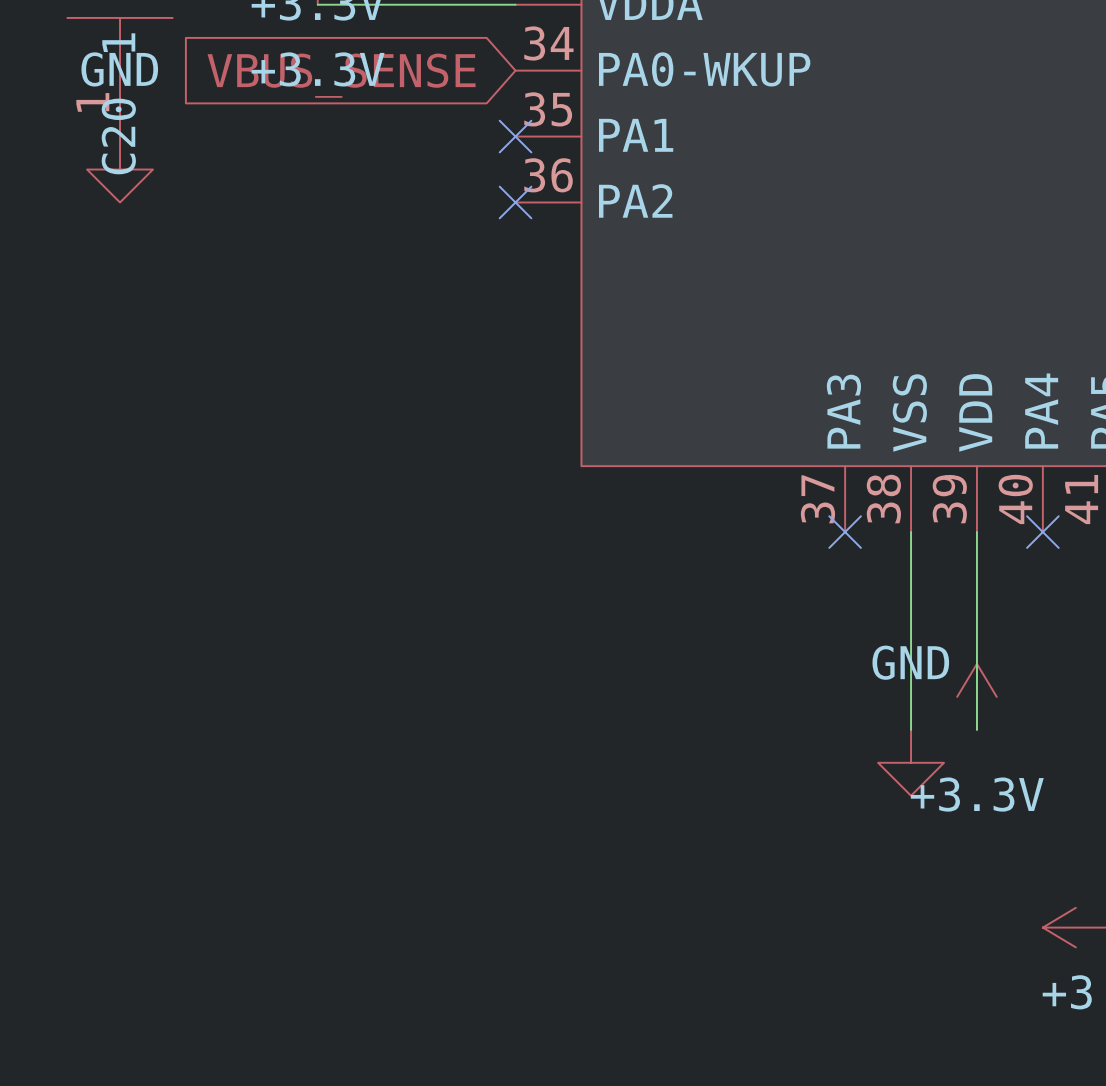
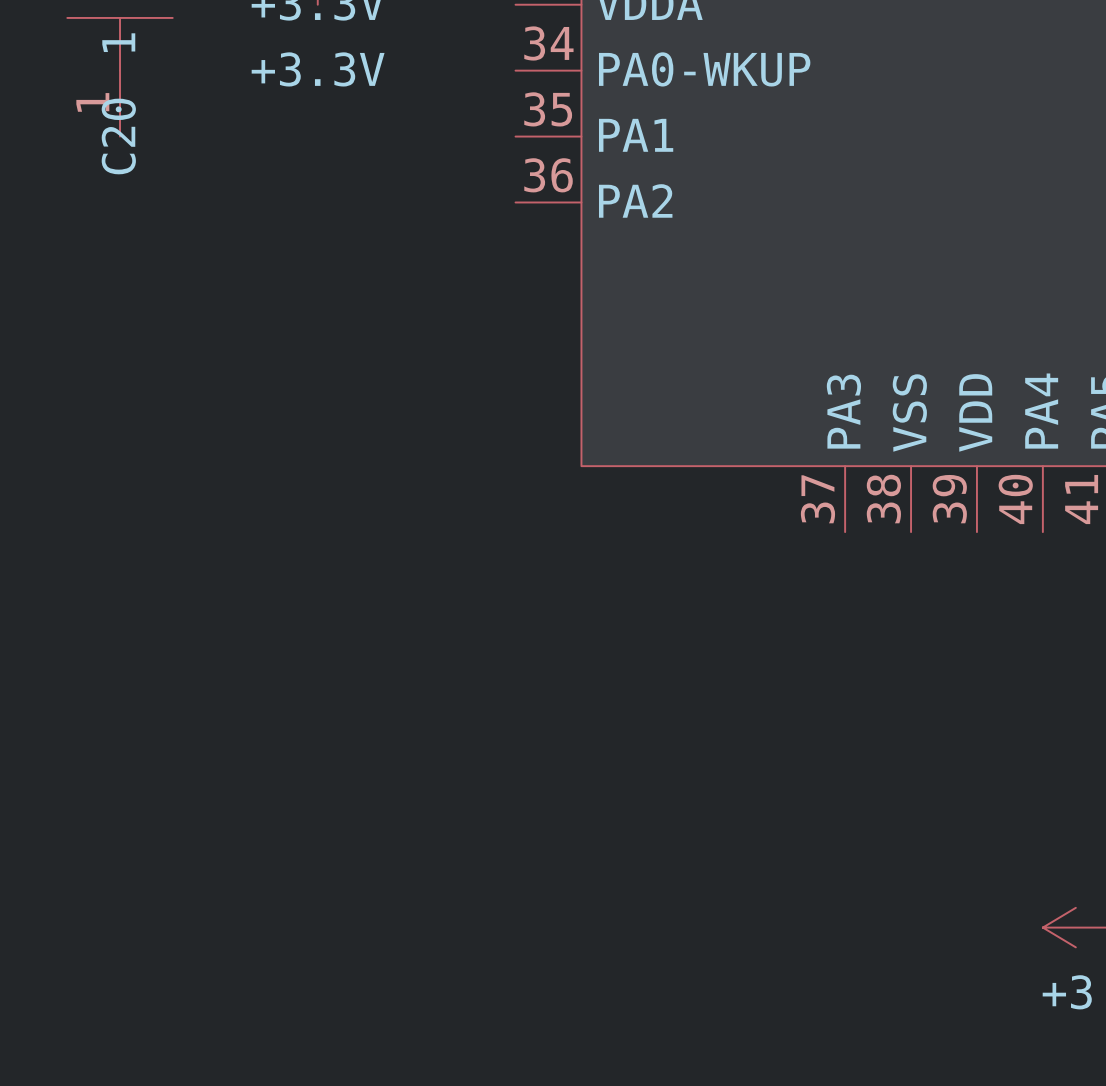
wire: (317, 4) (515, 4) -> none
global label: VBUS_SENSE (341, 75) -> none
no-connect mark: (515, 136) -> none
power symbol: GND (120, 169) -> none
no-connect mark: (515, 202) -> none
no-connect mark: (845, 532) -> none
wire: (911, 532) (911, 729) -> none
wire: (976, 532) (976, 729) -> none
no-connect mark: (1042, 532) -> none
power symbol: +3.3V (976, 696) -> none
power symbol: GND (911, 762) -> none

